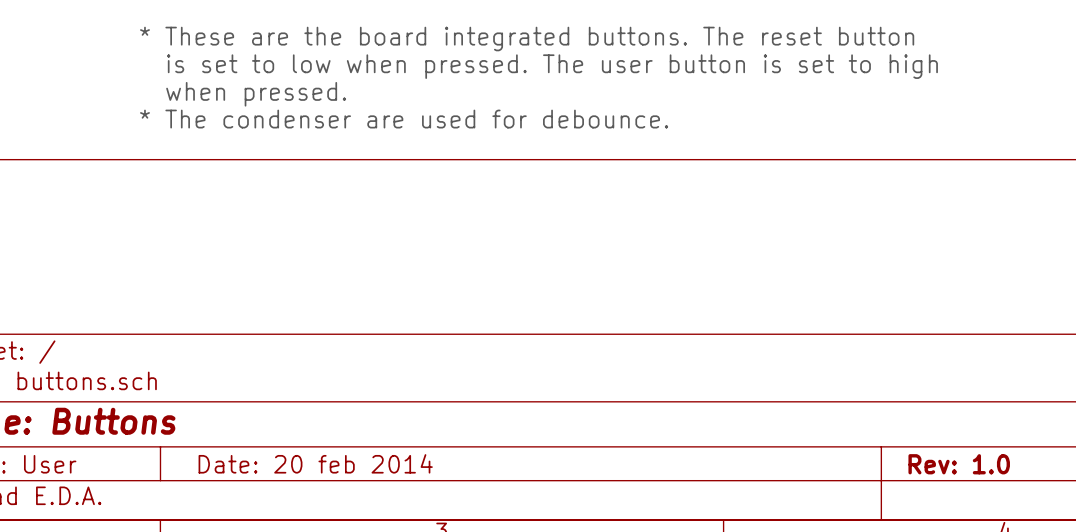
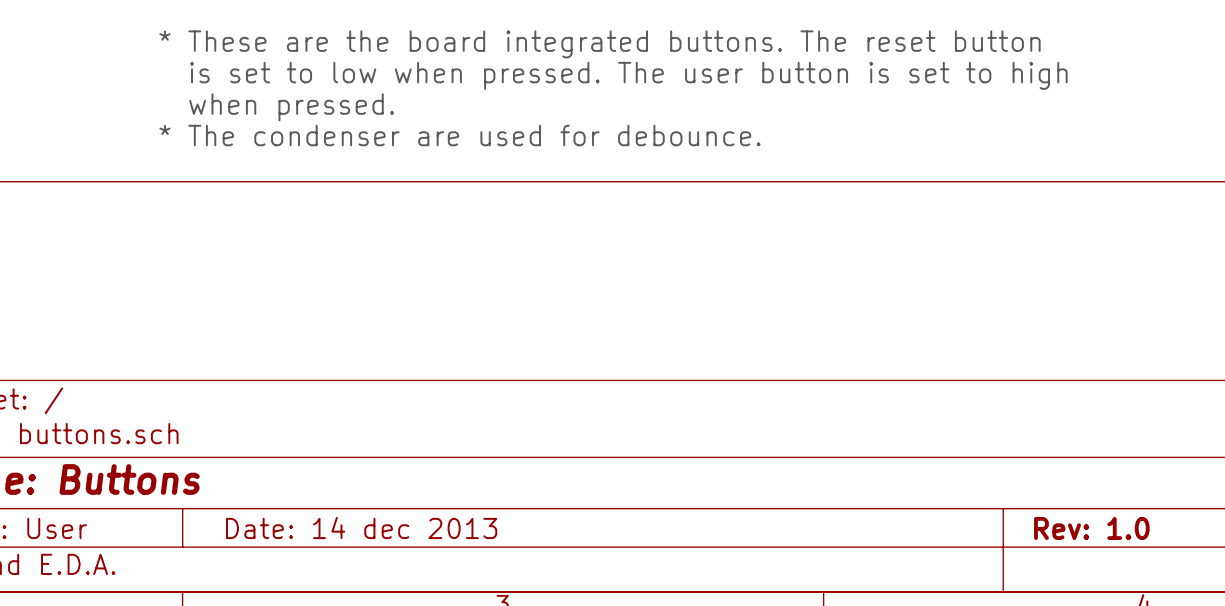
title block: Date: 20 feb 2014 (315, 463) -> Date: 14 dec 2013 (361, 528)

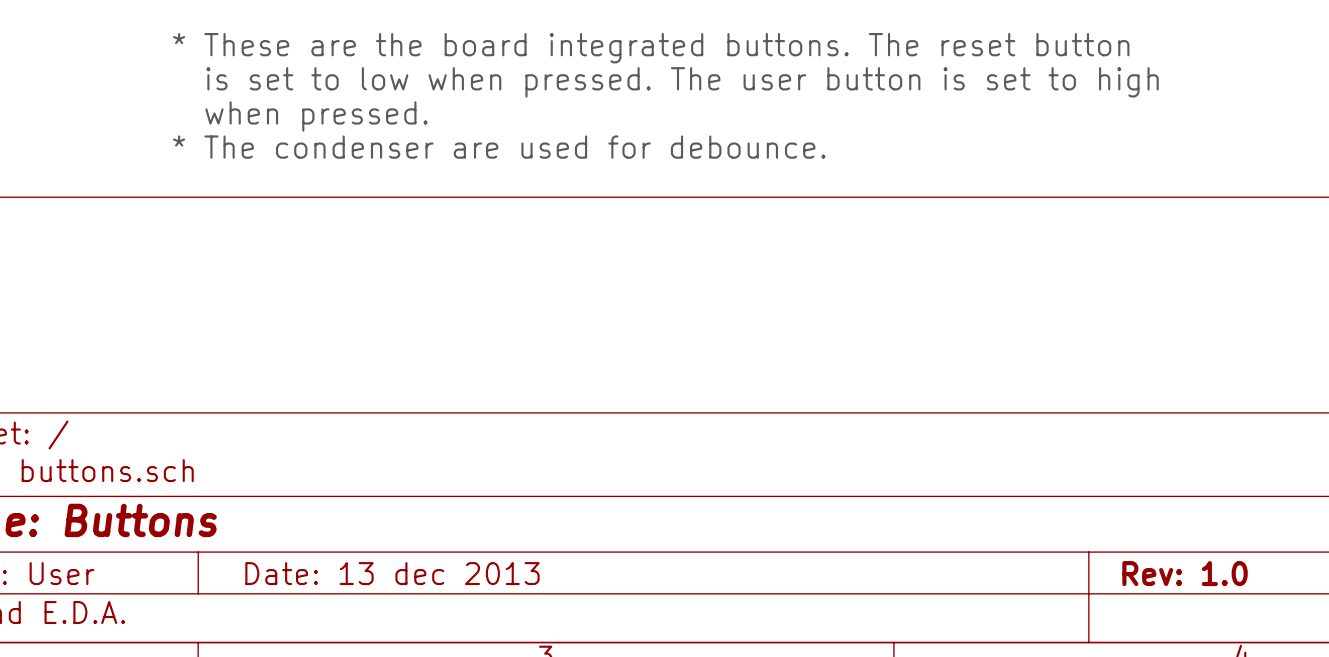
title block: Date: 14 dec 2013 (361, 528) -> Date: 13 dec 2013 (392, 573)

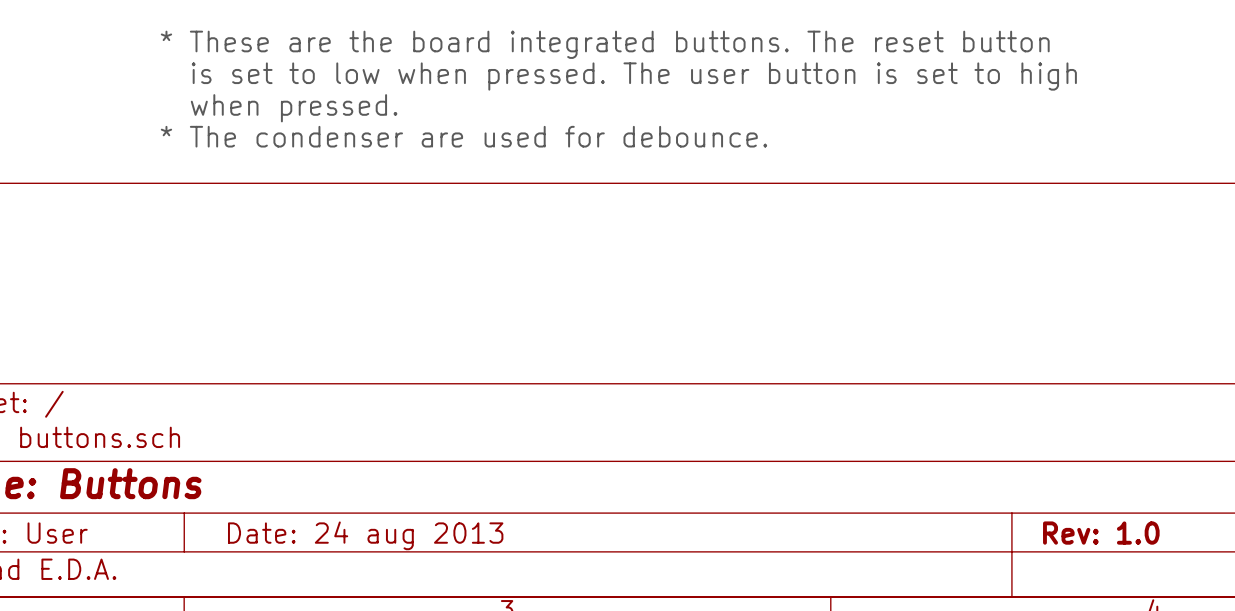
title block: Date: 13 dec 2013 (392, 573) -> Date: 24 aug 2013 (365, 535)

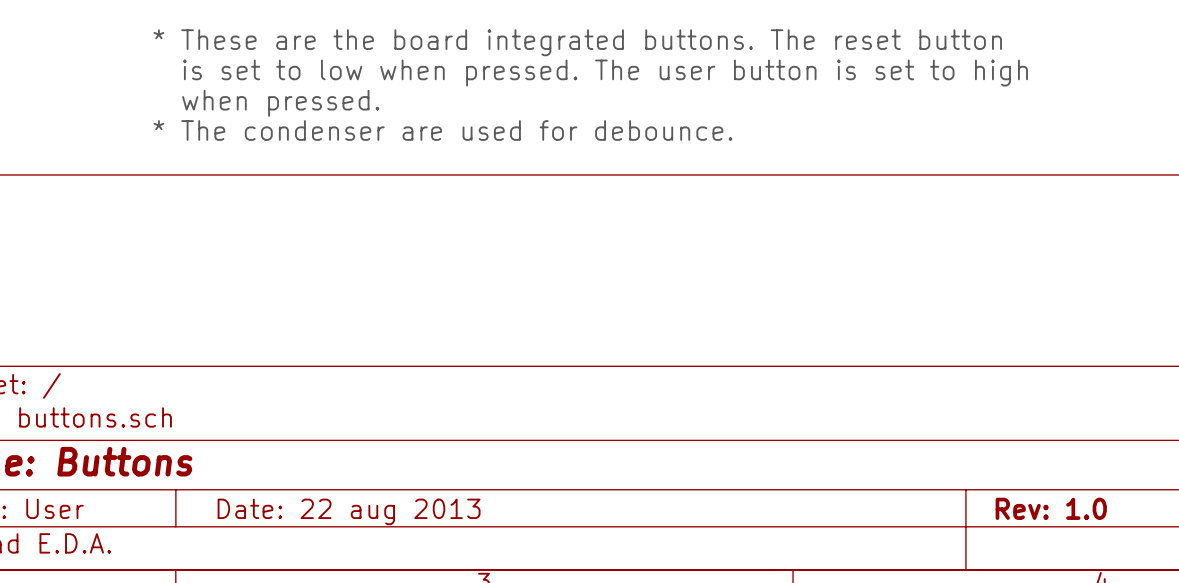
title block: Date: 24 aug 2013 (365, 535) -> Date: 22 aug 2013 (349, 511)

